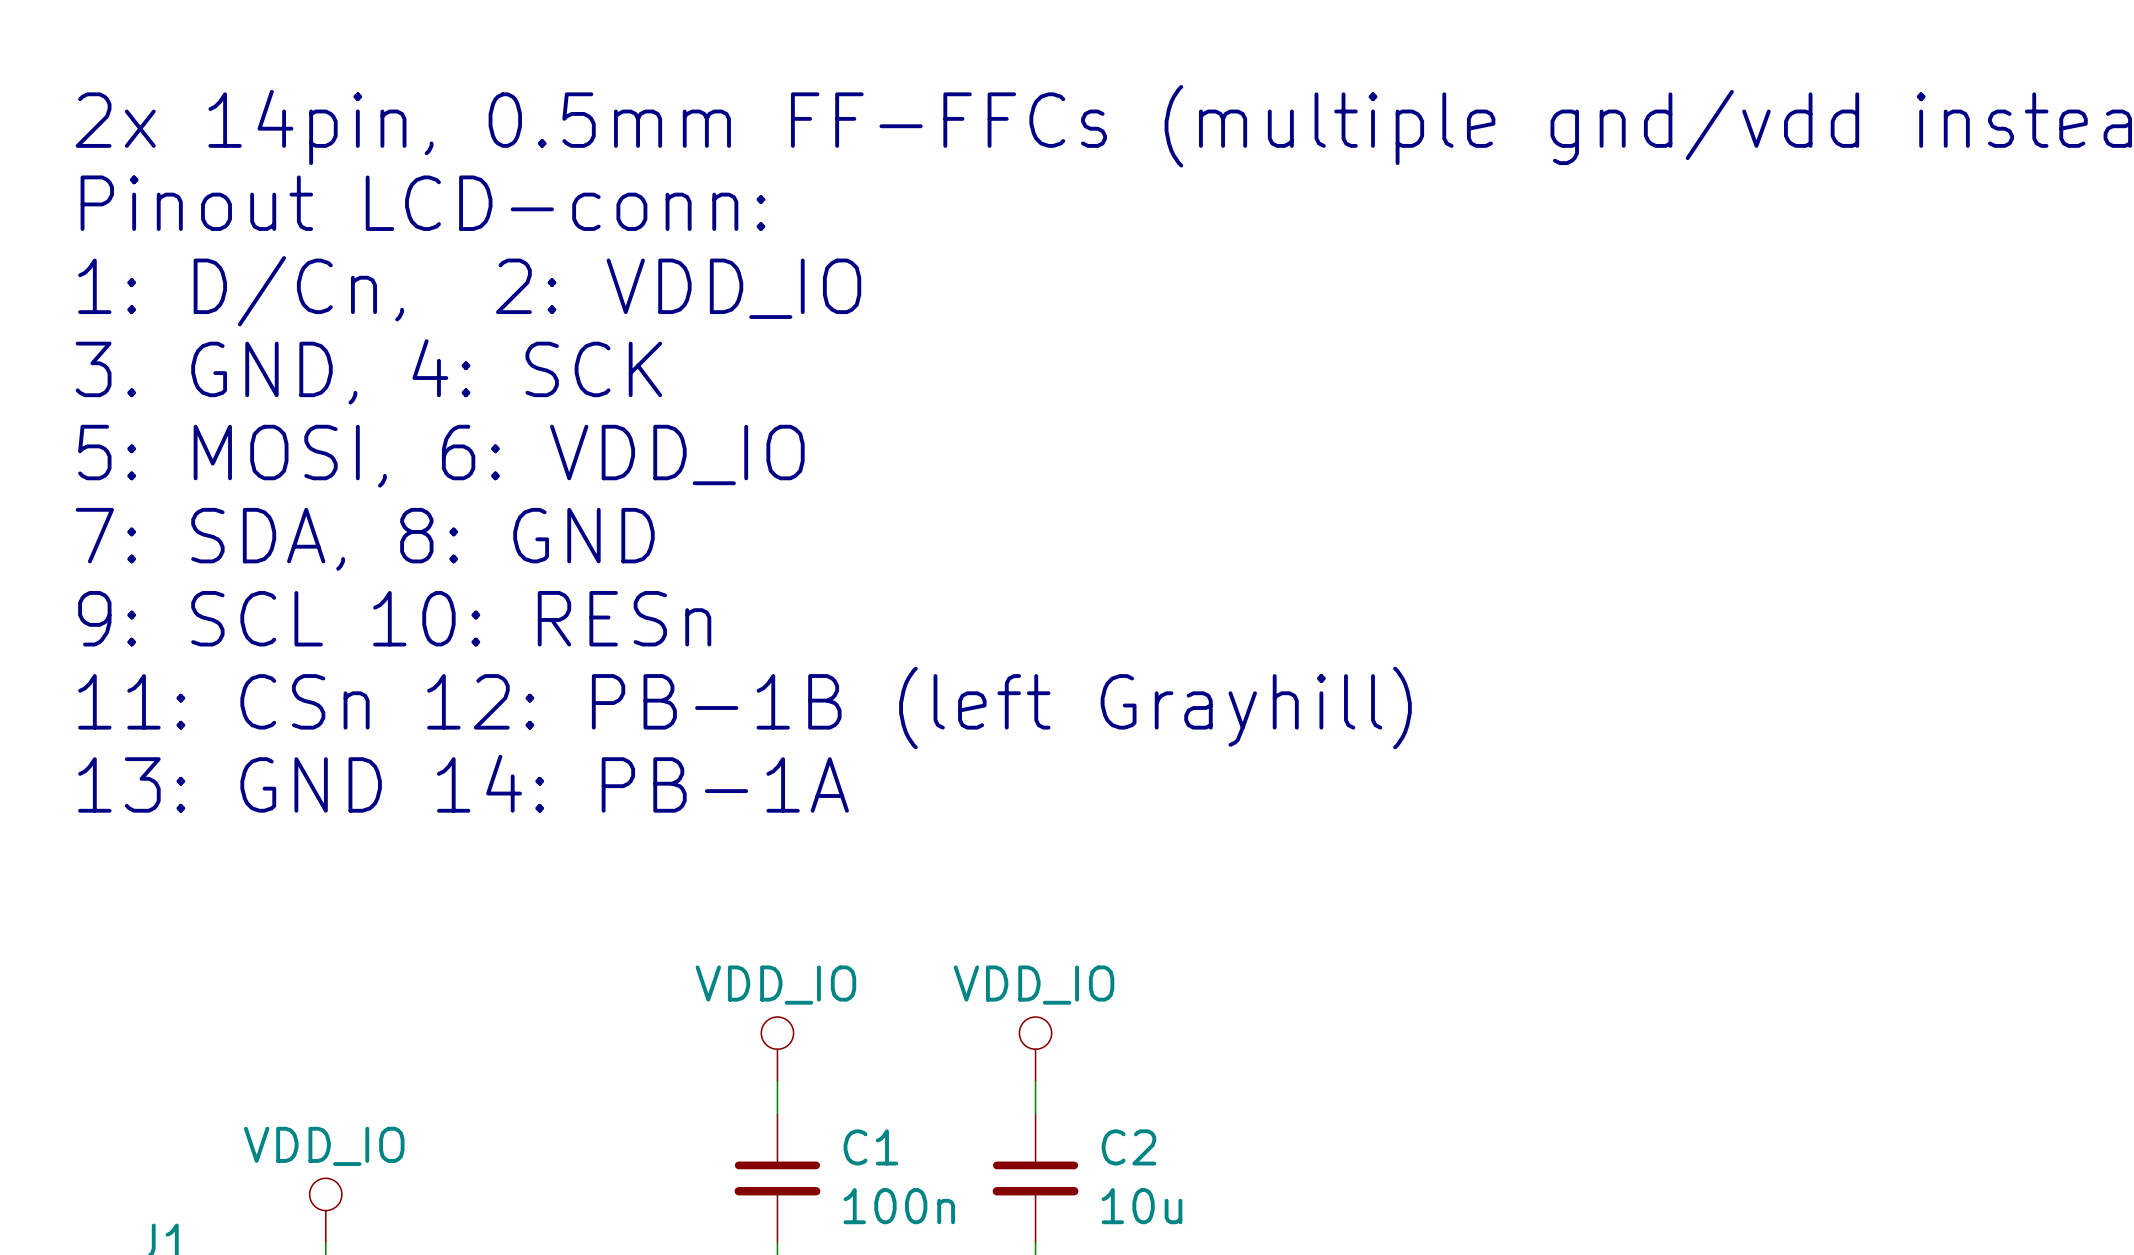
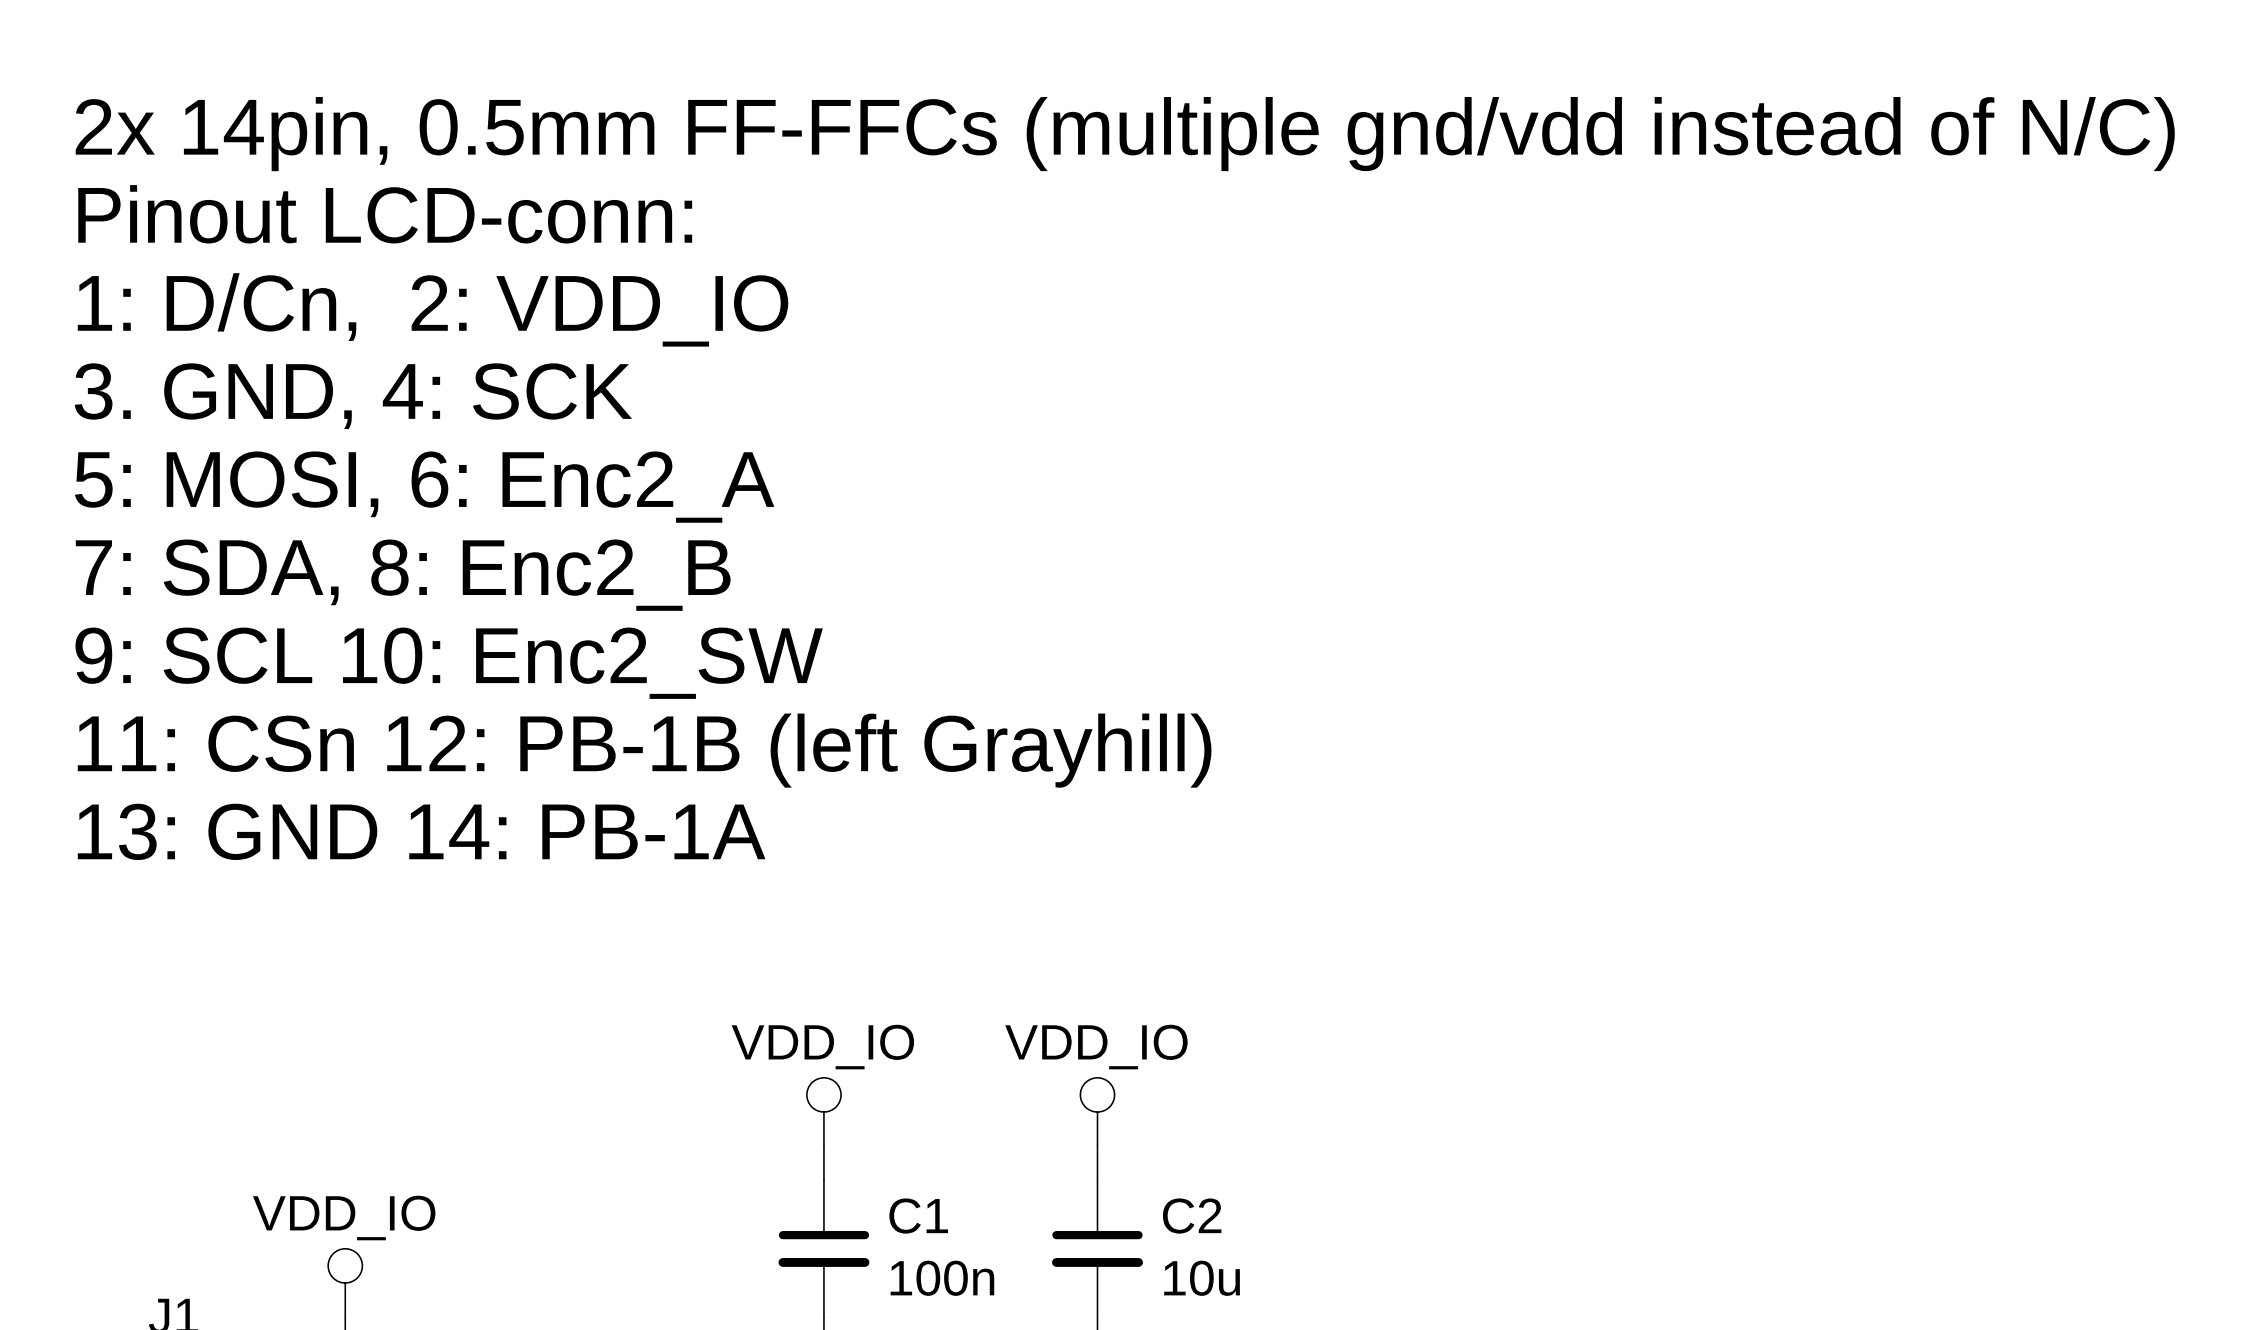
text: 5: MOSI, 6: VDD_IO (441, 456) -> 5: MOSI, 6: Enc2_A (424, 487)
text: 7: SDA, 8: GND (365, 539) -> 7: SDA, 8: Enc2_B (403, 575)
text: 9: SCL 10: RESn (394, 618) -> 9: SCL 10: Enc2_SW (449, 663)

